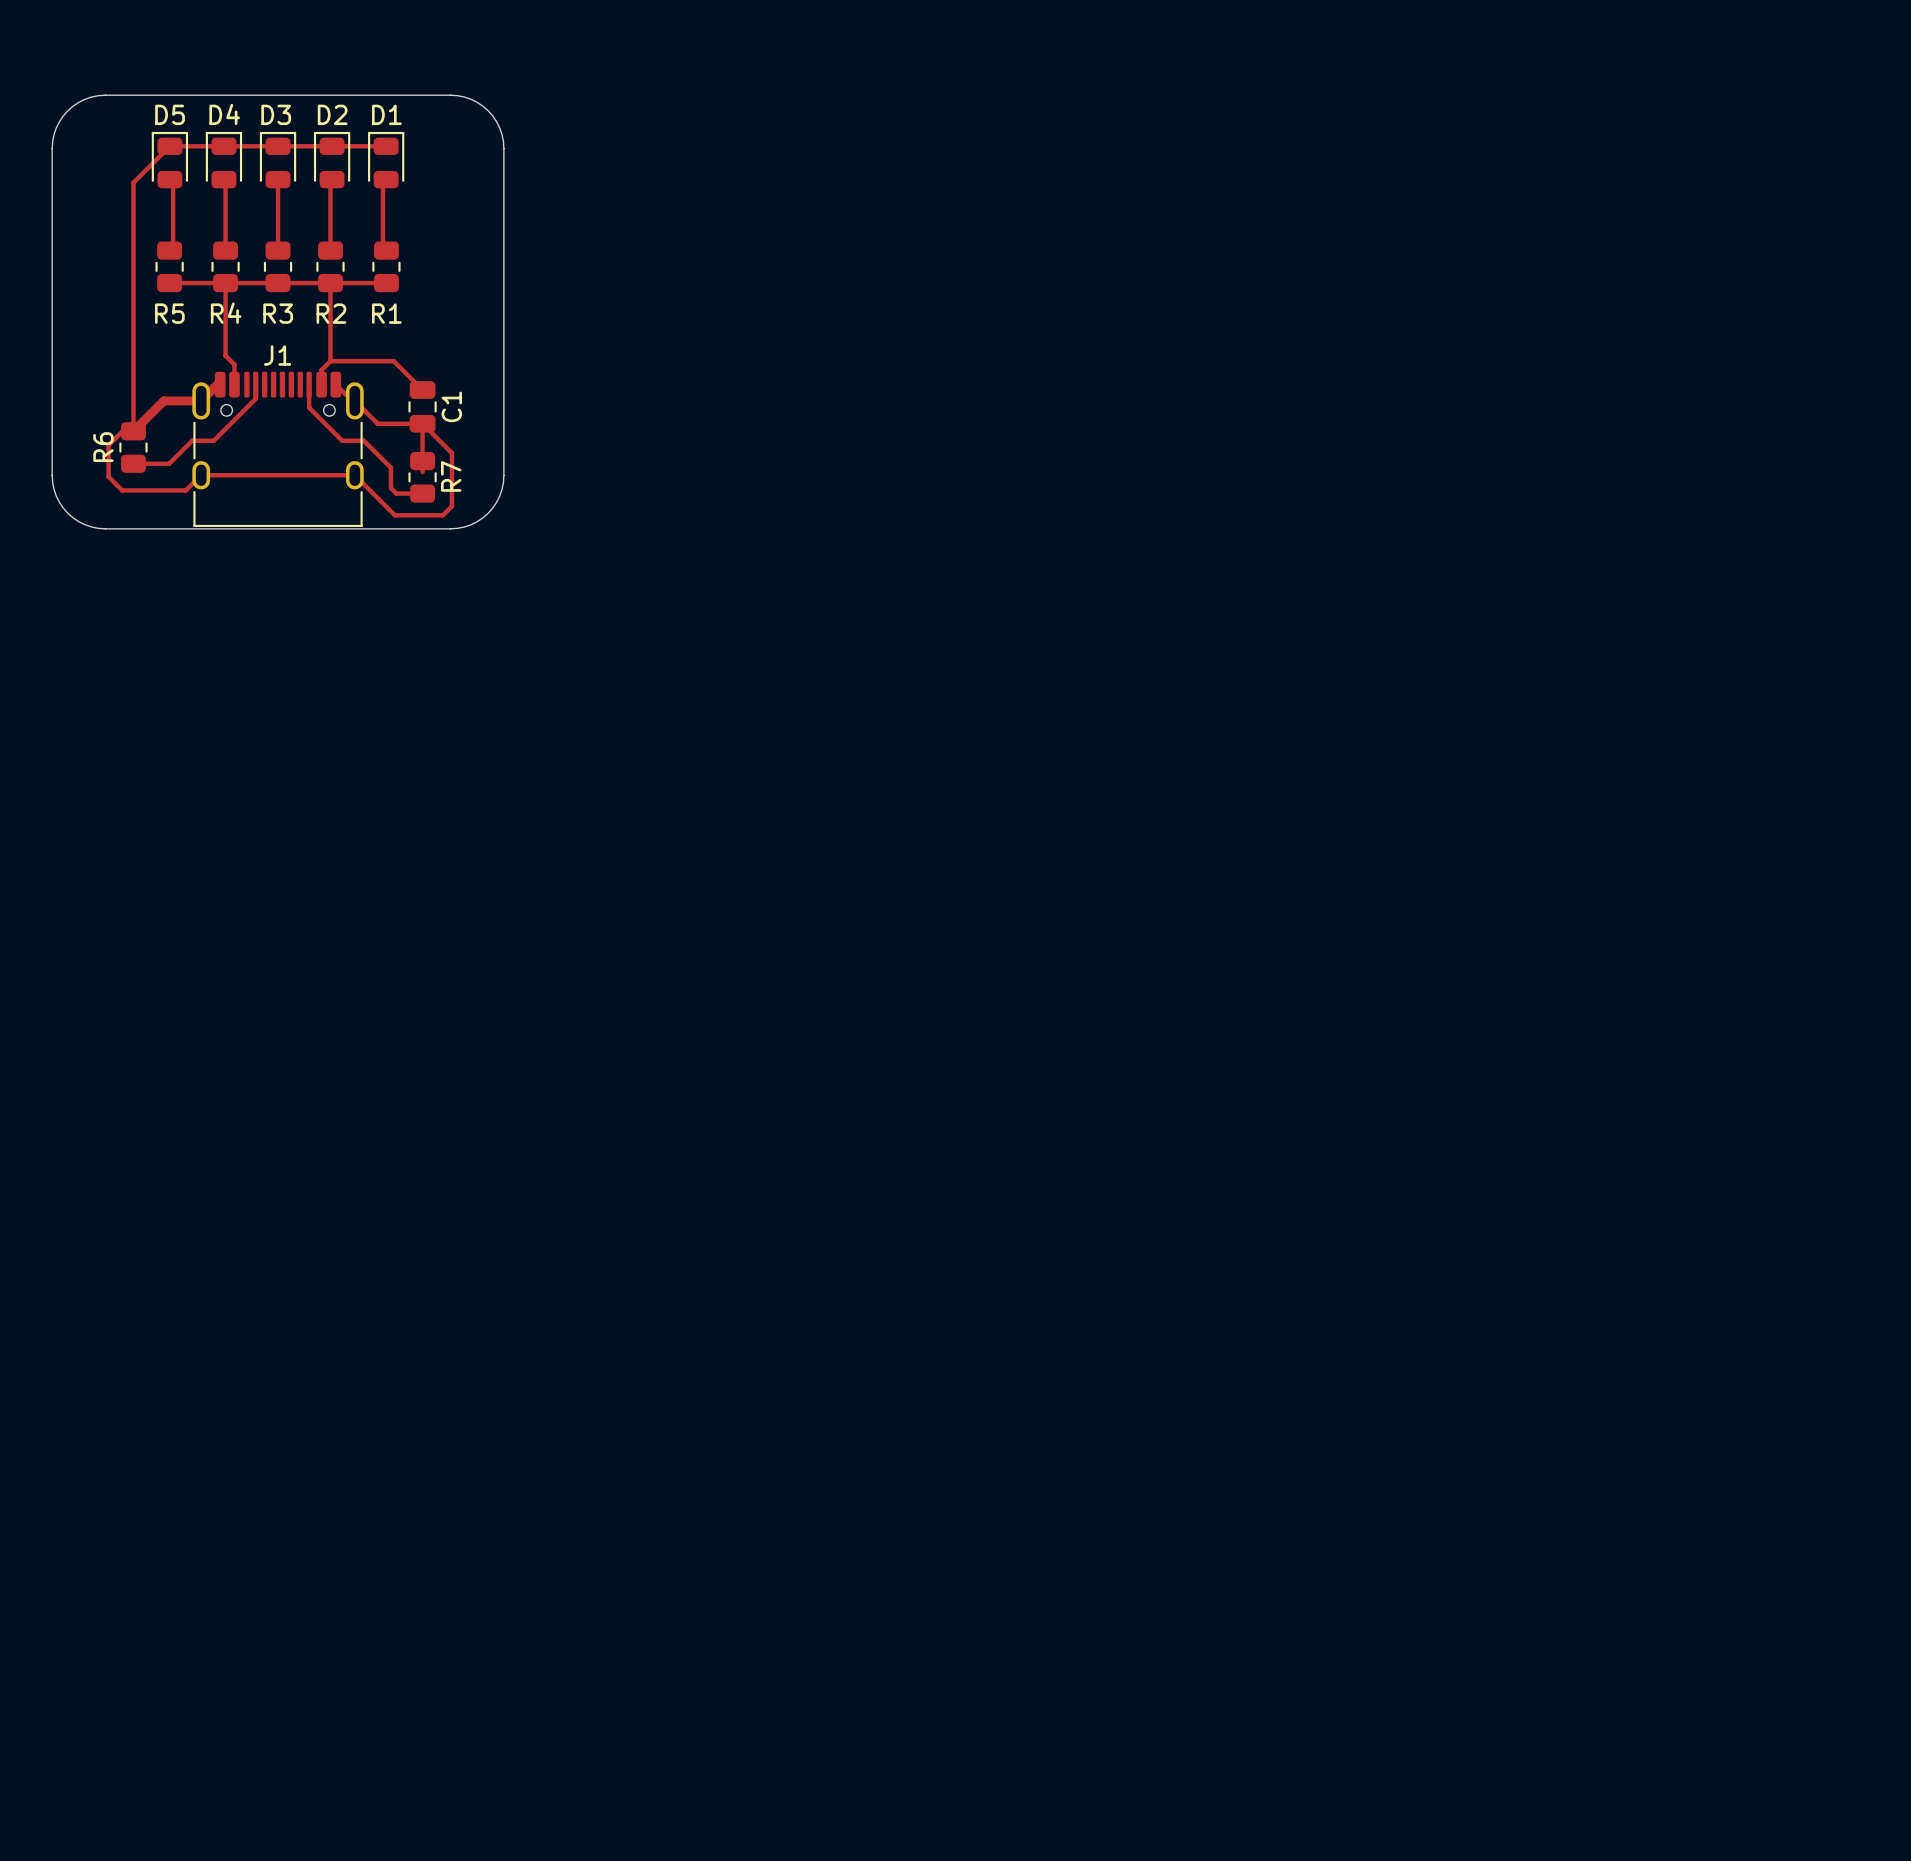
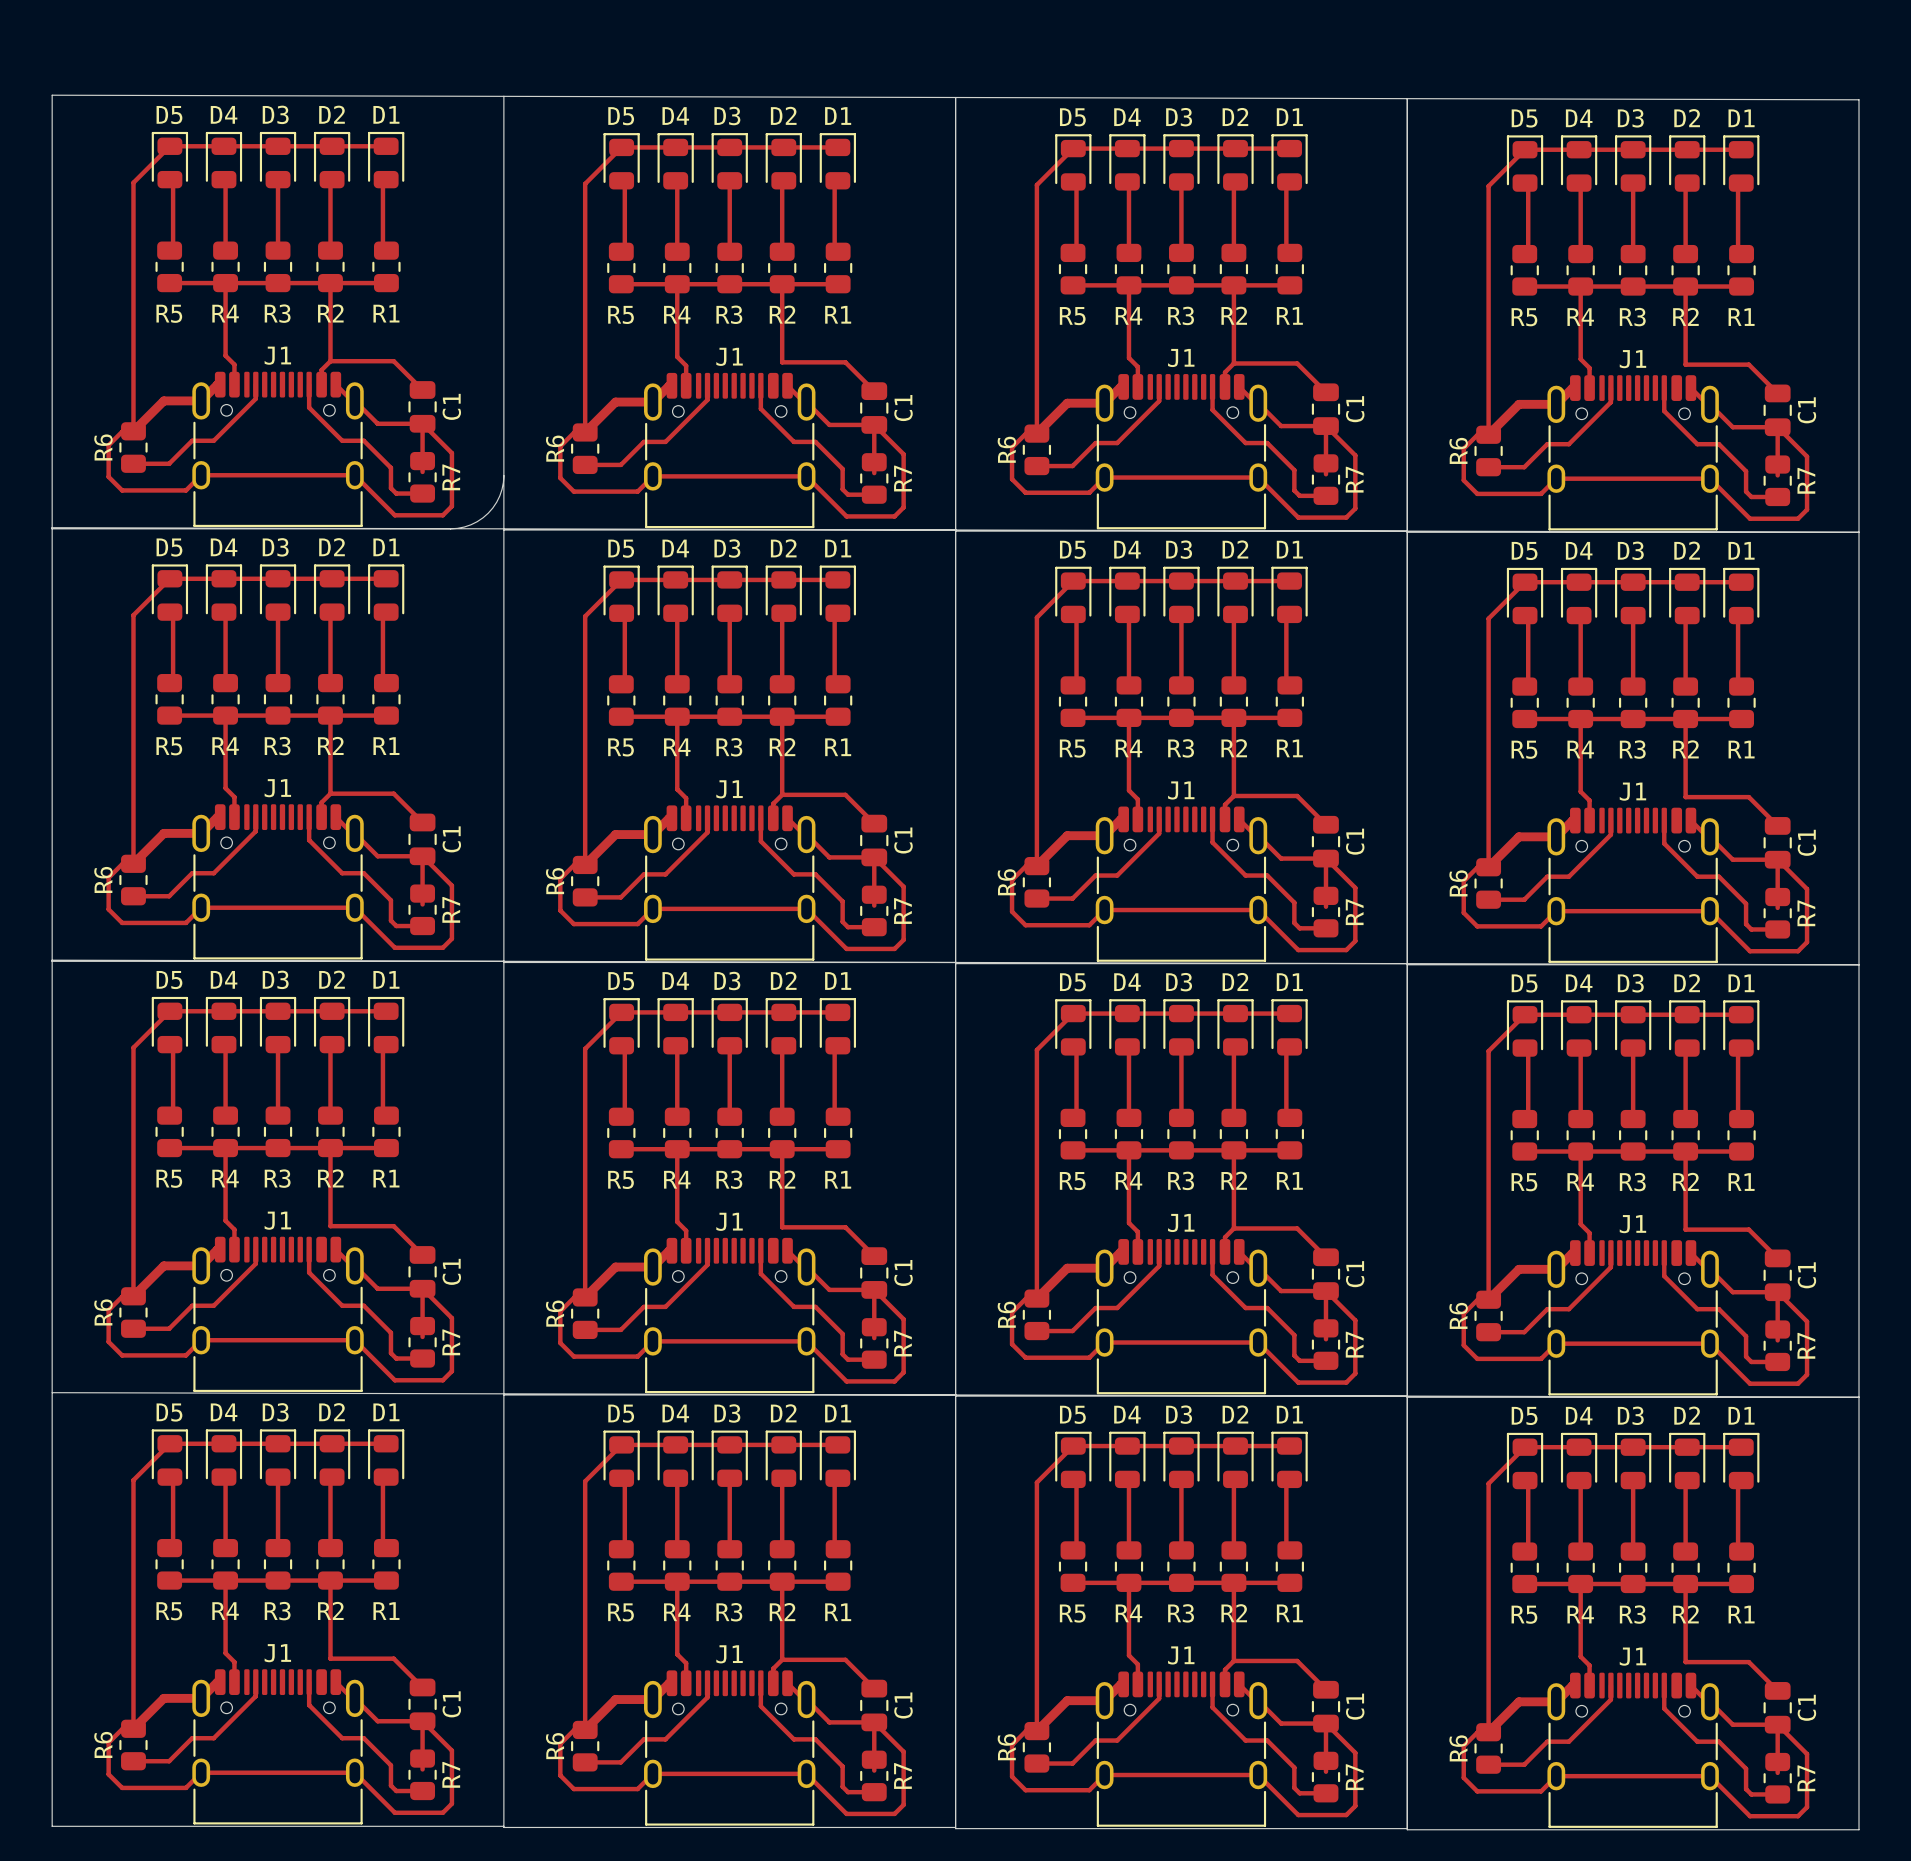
board edge: none -> (955, 97) (955, 1828) (1407, 1828)
board edge: none -> (1407, 98) (1407, 1829) (1859, 1829) (1859, 99) (52, 95) (52, 148)
track: none -> (837, 147) (621, 147) (585, 183) (585, 432)
board edge: (52, 148) (56, 128) (67, 110) (85, 99) (105, 95) (457, 95) (470, 99) (488, 110) (499, 128) (503, 148) -> (503, 96) (503, 148)
track: none -> (1289, 148) (1073, 148) (1036, 185) (1036, 433)
track: none -> (1741, 149) (1525, 149) (1488, 186) (1488, 434)
D5: none -> (621, 161)
D4: none -> (675, 161)
D3: none -> (729, 161)
D2: none -> (783, 161)
D1: none -> (837, 161)
D5: none -> (1073, 162)
D4: none -> (1127, 162)
D3: none -> (1181, 162)
D2: none -> (1235, 162)
D1: none -> (1289, 162)
D5: none -> (1525, 163)
D4: none -> (1579, 163)
D3: none -> (1633, 163)
D2: none -> (1687, 163)
D1: none -> (1741, 163)
track: none -> (621, 180) (624, 183) (624, 251)
track: none -> (675, 180) (677, 182) (677, 251)
track: none -> (729, 180) (729, 251)
track: none -> (783, 180) (782, 182) (782, 251)
track: none -> (837, 180) (834, 183) (834, 251)
track: none -> (1073, 181) (1076, 185) (1076, 252)
track: none -> (1127, 181) (1128, 183) (1128, 252)
track: none -> (1181, 181) (1181, 252)
track: none -> (1235, 181) (1233, 183) (1233, 252)
track: none -> (1289, 181) (1286, 185) (1286, 252)
track: none -> (1525, 183) (1528, 186) (1528, 254)
track: none -> (1579, 183) (1580, 184) (1580, 254)
track: none -> (1633, 183) (1633, 254)
track: none -> (1687, 183) (1685, 184) (1685, 254)
track: none -> (1741, 183) (1738, 186) (1738, 254)
R5: none -> (621, 268)
R4: none -> (677, 268)
R3: none -> (729, 268)
R2: none -> (782, 268)
R1: none -> (838, 268)
R5: none -> (1073, 269)
R4: none -> (1128, 269)
R3: none -> (1181, 269)
R2: none -> (1233, 269)
R1: none -> (1289, 269)
R5: none -> (1524, 270)
R4: none -> (1580, 270)
R3: none -> (1633, 270)
R2: none -> (1685, 270)
R1: none -> (1741, 270)
track: none -> (624, 284) (834, 284)
track: none -> (677, 284) (677, 356) (686, 365) (686, 385)
track: none -> (782, 284) (782, 362) (845, 362) (874, 391)
track: none -> (1076, 285) (1286, 285)
track: none -> (1128, 285) (1128, 358) (1137, 366) (1137, 386)
track: none -> (1233, 285) (1233, 363)
track: none -> (1528, 286) (1738, 286)
track: none -> (1580, 286) (1580, 359) (1589, 368) (1589, 388)
track: none -> (1685, 286) (1685, 364) (1748, 364) (1777, 393)
track: none -> (1233, 363) (1297, 363) (1325, 392)
track: none -> (1233, 363) (1225, 372) (1225, 386)
track: none -> (671, 385) (669, 385) (652, 402) (615, 402) (585, 432)
track: none -> (707, 385) (707, 399) (665, 441) (643, 441) (620, 464) (585, 464)
track: none -> (760, 385) (760, 408) (793, 441) (815, 441) (842, 469) (842, 489) (848, 494) (874, 494)
track: none -> (787, 385) (829, 424) (874, 424)
track: none -> (1123, 386) (1120, 386) (1104, 403) (1067, 403) (1036, 433)
track: none -> (1159, 386) (1159, 401) (1117, 443) (1095, 443) (1072, 466) (1036, 466)
track: none -> (1212, 386) (1212, 409) (1245, 443) (1267, 443) (1294, 470) (1294, 490) (1299, 495) (1325, 495)
track: none -> (1239, 386) (1281, 426) (1325, 426)
track: none -> (1575, 388) (1572, 388) (1556, 404) (1519, 404) (1488, 434)
track: none -> (1610, 388) (1610, 402) (1568, 444) (1547, 444) (1524, 467) (1488, 467)
track: none -> (1664, 388) (1664, 411) (1697, 444) (1718, 444) (1746, 471) (1746, 491) (1751, 496) (1777, 496)
track: none -> (1690, 388) (1732, 427) (1777, 427)
C1: none -> (874, 408)
C1: none -> (1325, 409)
C1: none -> (1777, 410)
track: none -> (874, 424) (874, 473)
track: none -> (874, 424) (903, 454) (903, 507) (894, 516) (846, 516) (806, 476) (652, 476) (637, 491) (573, 491) (560, 478) (560, 446) (574, 432) (585, 432)
track: none -> (1325, 426) (1325, 474)
track: none -> (1325, 426) (1355, 455) (1355, 508) (1346, 517) (1298, 517) (1258, 477) (1104, 477) (1089, 492) (1025, 492) (1012, 479) (1012, 447) (1026, 433) (1036, 433)
track: none -> (1777, 427) (1777, 475)
track: none -> (1777, 427) (1807, 456) (1807, 509) (1798, 518) (1750, 518) (1709, 478) (1556, 478) (1541, 493) (1477, 493) (1463, 480) (1463, 448) (1477, 434) (1488, 434)
R6: none -> (585, 448)
R6: none -> (1036, 449)
J1: none -> (729, 450)
R6: none -> (1488, 450)
J1: none -> (1181, 451)
J1: none -> (1633, 452)
board edge: (52, 475) (56, 495) (67, 513) (85, 524) (105, 528) -> (52, 528) (105, 528)
board edge: none -> (52, 475) (52, 1826) (503, 1826)
board edge: none -> (503, 475) (503, 1827) (955, 1827)
R7: none -> (874, 478)
R7: none -> (1325, 479)
R7: none -> (1777, 480)
board edge: none -> (52, 527) (1859, 532) (1407, 532)
board edge: none -> (503, 529) (955, 529)
board edge: none -> (955, 531) (1407, 531)
track: none -> (386, 578) (169, 578) (133, 615) (133, 863)
track: none -> (837, 579) (621, 579) (585, 616) (585, 864)
track: none -> (1289, 581) (1073, 581) (1036, 617) (1036, 866)
track: none -> (1741, 582) (1525, 582) (1488, 618) (1488, 867)
D5: none -> (169, 592)
D4: none -> (223, 592)
D3: none -> (278, 592)
D2: none -> (332, 592)
D1: none -> (386, 592)
D5: none -> (621, 593)
D4: none -> (675, 593)
D3: none -> (729, 593)
D2: none -> (783, 593)
D1: none -> (837, 593)
D5: none -> (1073, 594)
D4: none -> (1127, 594)
D3: none -> (1181, 594)
D2: none -> (1235, 594)
D1: none -> (1289, 594)
D5: none -> (1525, 596)
D4: none -> (1579, 596)
D3: none -> (1633, 596)
D2: none -> (1687, 596)
D1: none -> (1741, 596)
track: none -> (169, 612) (173, 615) (173, 683)
track: none -> (223, 612) (225, 613) (225, 683)
track: none -> (278, 612) (278, 683)
track: none -> (332, 612) (330, 613) (330, 683)
track: none -> (386, 612) (382, 615) (382, 683)
track: none -> (621, 613) (624, 616) (624, 684)
track: none -> (675, 613) (677, 614) (677, 684)
track: none -> (729, 613) (729, 684)
track: none -> (783, 613) (782, 614) (782, 684)
track: none -> (837, 613) (834, 616) (834, 684)
track: none -> (1073, 614) (1076, 617) (1076, 685)
track: none -> (1127, 614) (1128, 616) (1128, 685)
track: none -> (1181, 614) (1181, 685)
track: none -> (1235, 614) (1233, 616) (1233, 685)
track: none -> (1289, 614) (1286, 617) (1286, 685)
track: none -> (1525, 615) (1528, 618) (1528, 686)
track: none -> (1579, 615) (1580, 617) (1580, 686)
track: none -> (1633, 615) (1633, 686)
track: none -> (1687, 615) (1685, 617) (1685, 686)
track: none -> (1741, 615) (1738, 618) (1738, 686)
R5: none -> (169, 699)
R4: none -> (225, 699)
R3: none -> (278, 699)
R2: none -> (330, 699)
R1: none -> (386, 699)
R5: none -> (621, 700)
R4: none -> (677, 700)
R3: none -> (729, 700)
R2: none -> (782, 700)
R1: none -> (838, 700)
R5: none -> (1073, 701)
R4: none -> (1128, 701)
R3: none -> (1181, 701)
R2: none -> (1233, 701)
R1: none -> (1289, 701)
R5: none -> (1524, 702)
R4: none -> (1580, 702)
R3: none -> (1633, 702)
R2: none -> (1685, 702)
R1: none -> (1741, 702)
track: none -> (173, 715) (382, 715)
track: none -> (225, 715) (225, 788) (234, 797) (234, 817)
track: none -> (330, 715) (330, 793)
track: none -> (624, 716) (834, 716)
track: none -> (677, 716) (677, 789) (686, 798) (686, 818)
track: none -> (782, 716) (782, 794)
track: none -> (1076, 717) (1286, 717)
track: none -> (1128, 717) (1128, 790) (1137, 799) (1137, 819)
track: none -> (1233, 717) (1233, 795)
track: none -> (1528, 719) (1738, 719)
track: none -> (1580, 719) (1580, 791) (1589, 800) (1589, 820)
track: none -> (1685, 719) (1685, 797) (1748, 797) (1777, 825)
track: none -> (330, 793) (321, 802) (321, 817)
track: none -> (330, 793) (393, 793) (422, 822)
track: none -> (782, 794) (773, 803) (773, 818)
track: none -> (782, 794) (845, 794) (874, 823)
track: none -> (1233, 795) (1225, 804) (1225, 819)
track: none -> (1233, 795) (1297, 795) (1325, 824)
track: none -> (220, 817) (217, 817) (201, 833) (163, 833) (133, 863)
track: none -> (255, 817) (255, 831) (213, 873) (192, 873) (169, 896) (133, 896)
track: none -> (309, 817) (309, 840) (342, 873) (363, 873) (390, 900) (390, 920) (396, 926) (422, 926)
track: none -> (335, 817) (377, 856) (422, 856)
track: none -> (671, 818) (669, 818) (652, 834) (615, 834) (585, 864)
track: none -> (707, 818) (707, 832) (665, 874) (643, 874) (620, 897) (585, 897)
track: none -> (760, 818) (760, 841) (793, 874) (815, 874) (842, 901) (842, 921) (848, 927) (874, 927)
track: none -> (787, 818) (829, 857) (874, 857)
track: none -> (1123, 819) (1120, 819) (1104, 835) (1067, 835) (1036, 866)
track: none -> (1159, 819) (1159, 833) (1117, 875) (1095, 875) (1072, 898) (1036, 898)
track: none -> (1212, 819) (1212, 842) (1245, 875) (1267, 875) (1294, 902) (1294, 922) (1299, 928) (1325, 928)
track: none -> (1239, 819) (1281, 858) (1325, 858)
track: none -> (1575, 820) (1572, 820) (1556, 836) (1519, 836) (1488, 867)
track: none -> (1610, 820) (1610, 834) (1568, 876) (1547, 876) (1524, 899) (1488, 899)
track: none -> (1664, 820) (1664, 843) (1697, 876) (1718, 876) (1746, 903) (1746, 924) (1751, 929) (1777, 929)
track: none -> (1690, 820) (1732, 859) (1777, 859)
C1: none -> (422, 839)
C1: none -> (874, 840)
C1: none -> (1325, 841)
C1: none -> (1777, 842)
track: none -> (422, 856) (422, 904)
track: none -> (422, 856) (451, 885) (451, 938) (442, 947) (394, 947) (354, 907) (201, 907) (185, 922) (122, 922) (108, 909) (108, 877) (122, 863) (133, 863)
track: none -> (874, 857) (874, 905)
track: none -> (874, 857) (903, 886) (903, 939) (894, 948) (846, 948) (806, 908) (652, 908) (637, 924) (573, 924) (560, 910) (560, 878) (574, 864) (585, 864)
track: none -> (1325, 858) (1325, 906)
track: none -> (1325, 858) (1355, 887) (1355, 941) (1346, 950) (1298, 950) (1258, 910) (1104, 910) (1089, 925) (1025, 925) (1012, 911) (1012, 880) (1026, 866) (1036, 866)
track: none -> (1777, 859) (1777, 907)
track: none -> (1777, 859) (1807, 889) (1807, 942) (1798, 951) (1750, 951) (1709, 911) (1556, 911) (1541, 926) (1477, 926) (1463, 912) (1463, 881) (1477, 867) (1488, 867)
R6: none -> (133, 880)
J1: none -> (278, 881)
R6: none -> (585, 881)
R6: none -> (1036, 882)
J1: none -> (729, 883)
R6: none -> (1488, 883)
J1: none -> (1181, 884)
J1: none -> (1633, 885)
R7: none -> (422, 909)
R7: none -> (874, 910)
R7: none -> (1325, 912)
R7: none -> (1777, 913)
board edge: none -> (52, 960) (1859, 964) (1407, 964)
board edge: none -> (52, 961) (503, 961)
board edge: none -> (503, 962) (955, 962)
board edge: none -> (955, 963) (1407, 963)
track: none -> (386, 1011) (169, 1011) (133, 1047) (133, 1296)
track: none -> (837, 1012) (621, 1012) (585, 1048) (585, 1297)
track: none -> (1289, 1013) (1073, 1013) (1036, 1049) (1036, 1298)
track: none -> (1741, 1014) (1525, 1014) (1488, 1051) (1488, 1299)
D5: none -> (169, 1025)
D4: none -> (223, 1025)
D3: none -> (278, 1025)
D2: none -> (332, 1025)
D1: none -> (386, 1025)
D5: none -> (621, 1026)
D4: none -> (675, 1026)
D3: none -> (729, 1026)
D2: none -> (783, 1026)
D1: none -> (837, 1026)
D5: none -> (1073, 1027)
D4: none -> (1127, 1027)
D3: none -> (1181, 1027)
D2: none -> (1235, 1027)
D1: none -> (1289, 1027)
D5: none -> (1525, 1028)
D4: none -> (1579, 1028)
D3: none -> (1633, 1028)
D2: none -> (1687, 1028)
D1: none -> (1741, 1028)
track: none -> (169, 1044) (173, 1047) (173, 1115)
track: none -> (223, 1044) (225, 1046) (225, 1115)
track: none -> (278, 1044) (278, 1115)
track: none -> (332, 1044) (330, 1046) (330, 1115)
track: none -> (386, 1044) (382, 1047) (382, 1115)
track: none -> (621, 1045) (624, 1048) (624, 1116)
track: none -> (675, 1045) (677, 1047) (677, 1116)
track: none -> (729, 1045) (729, 1116)
track: none -> (783, 1045) (782, 1047) (782, 1116)
track: none -> (837, 1045) (834, 1048) (834, 1116)
track: none -> (1073, 1046) (1076, 1050) (1076, 1117)
track: none -> (1127, 1046) (1128, 1048) (1128, 1117)
track: none -> (1181, 1046) (1181, 1117)
track: none -> (1235, 1046) (1233, 1048) (1233, 1117)
track: none -> (1289, 1046) (1286, 1050) (1286, 1117)
track: none -> (1525, 1048) (1528, 1051) (1528, 1119)
track: none -> (1579, 1048) (1580, 1049) (1580, 1119)
track: none -> (1633, 1048) (1633, 1119)
track: none -> (1687, 1048) (1685, 1049) (1685, 1119)
track: none -> (1741, 1048) (1738, 1051) (1738, 1119)
R5: none -> (169, 1131)
R4: none -> (225, 1131)
R3: none -> (278, 1131)
R2: none -> (330, 1131)
R1: none -> (386, 1131)
R5: none -> (621, 1132)
R4: none -> (677, 1132)
R3: none -> (729, 1132)
R2: none -> (782, 1132)
R1: none -> (838, 1132)
R5: none -> (1073, 1134)
R4: none -> (1128, 1134)
R3: none -> (1181, 1134)
R2: none -> (1233, 1134)
R1: none -> (1289, 1134)
R5: none -> (1524, 1135)
R4: none -> (1580, 1135)
R3: none -> (1633, 1135)
R2: none -> (1685, 1135)
R1: none -> (1741, 1135)
track: none -> (173, 1148) (382, 1148)
track: none -> (225, 1148) (225, 1220) (234, 1229) (234, 1249)
track: none -> (330, 1148) (330, 1226) (393, 1226) (422, 1254)
track: none -> (624, 1149) (834, 1149)
track: none -> (677, 1149) (677, 1221) (686, 1230) (686, 1250)
track: none -> (782, 1149) (782, 1227) (845, 1227) (874, 1256)
track: none -> (1076, 1150) (1286, 1150)
track: none -> (1128, 1150) (1128, 1223) (1137, 1231) (1137, 1251)
track: none -> (1233, 1150) (1233, 1228)
track: none -> (1528, 1151) (1738, 1151)
track: none -> (1580, 1151) (1580, 1224) (1589, 1233) (1589, 1253)
track: none -> (1685, 1151) (1685, 1229) (1748, 1229) (1777, 1258)
track: none -> (1233, 1228) (1297, 1228) (1325, 1257)
track: none -> (1233, 1228) (1225, 1237) (1225, 1251)
track: none -> (220, 1249) (217, 1249) (201, 1265) (163, 1265) (133, 1296)
track: none -> (255, 1249) (255, 1263) (213, 1305) (192, 1305) (169, 1328) (133, 1328)
track: none -> (309, 1249) (309, 1272) (342, 1305) (363, 1305) (390, 1332) (390, 1353) (396, 1358) (422, 1358)
track: none -> (335, 1249) (377, 1288) (422, 1288)
track: none -> (671, 1250) (669, 1250) (652, 1267) (615, 1267) (585, 1297)
track: none -> (707, 1250) (707, 1264) (665, 1306) (643, 1306) (620, 1329) (585, 1329)
track: none -> (760, 1250) (760, 1273) (793, 1306) (815, 1306) (842, 1333) (842, 1354) (848, 1359) (874, 1359)
track: none -> (787, 1250) (829, 1289) (874, 1289)
track: none -> (1123, 1251) (1120, 1251) (1104, 1268) (1067, 1268) (1036, 1298)
track: none -> (1159, 1251) (1159, 1266) (1117, 1308) (1095, 1308) (1072, 1331) (1036, 1331)
track: none -> (1212, 1251) (1212, 1274) (1245, 1308) (1267, 1308) (1294, 1335) (1294, 1355) (1299, 1360) (1325, 1360)
track: none -> (1239, 1251) (1281, 1291) (1325, 1291)
track: none -> (1575, 1253) (1572, 1253) (1556, 1269) (1519, 1269) (1488, 1299)
track: none -> (1610, 1253) (1610, 1267) (1568, 1309) (1547, 1309) (1524, 1332) (1488, 1332)
track: none -> (1664, 1253) (1664, 1276) (1697, 1309) (1718, 1309) (1746, 1336) (1746, 1356) (1751, 1361) (1777, 1361)
track: none -> (1690, 1253) (1732, 1292) (1777, 1292)
C1: none -> (422, 1271)
C1: none -> (874, 1273)
C1: none -> (1325, 1274)
C1: none -> (1777, 1275)
track: none -> (422, 1288) (422, 1336)
track: none -> (422, 1288) (451, 1318) (451, 1371) (442, 1380) (394, 1380) (354, 1340) (201, 1340) (185, 1355) (122, 1355) (108, 1341) (108, 1310) (122, 1296) (133, 1296)
track: none -> (874, 1289) (874, 1338)
track: none -> (874, 1289) (903, 1319) (903, 1372) (894, 1381) (846, 1381) (806, 1341) (652, 1341) (637, 1356) (573, 1356) (560, 1343) (560, 1311) (574, 1297) (585, 1297)
track: none -> (1325, 1291) (1355, 1320) (1355, 1373) (1346, 1382) (1298, 1382) (1258, 1342) (1104, 1342) (1089, 1357) (1025, 1357) (1012, 1344) (1012, 1312) (1026, 1298) (1036, 1298)
track: none -> (1325, 1291) (1325, 1339)
track: none -> (1777, 1292) (1777, 1340)
track: none -> (1777, 1292) (1807, 1321) (1807, 1374) (1798, 1383) (1750, 1383) (1709, 1343) (1556, 1343) (1541, 1358) (1477, 1358) (1463, 1345) (1463, 1313) (1477, 1299) (1488, 1299)
R6: none -> (133, 1312)
R6: none -> (585, 1313)
J1: none -> (278, 1314)
R6: none -> (1036, 1314)
J1: none -> (729, 1315)
R6: none -> (1488, 1315)
J1: none -> (1181, 1316)
J1: none -> (1633, 1317)
R7: none -> (422, 1342)
R7: none -> (874, 1343)
R7: none -> (1325, 1344)
R7: none -> (1777, 1345)
board edge: none -> (52, 1392) (1859, 1397) (1407, 1397)
board edge: none -> (503, 1394) (955, 1394)
board edge: none -> (955, 1396) (1407, 1396)
track: none -> (386, 1443) (169, 1443) (133, 1480) (133, 1728)
track: none -> (837, 1444) (621, 1444) (585, 1481) (585, 1729)
track: none -> (1289, 1446) (1073, 1446) (1036, 1482) (1036, 1731)
track: none -> (1741, 1447) (1525, 1447) (1488, 1483) (1488, 1732)
D5: none -> (169, 1457)
D4: none -> (223, 1457)
D3: none -> (278, 1457)
D2: none -> (332, 1457)
D1: none -> (386, 1457)
D5: none -> (621, 1458)
D4: none -> (675, 1458)
D3: none -> (729, 1458)
D2: none -> (783, 1458)
D1: none -> (837, 1458)
D5: none -> (1073, 1459)
D4: none -> (1127, 1459)
D3: none -> (1181, 1459)
D2: none -> (1235, 1459)
D1: none -> (1289, 1459)
D5: none -> (1525, 1461)
D4: none -> (1579, 1461)
D3: none -> (1633, 1461)
D2: none -> (1687, 1461)
D1: none -> (1741, 1461)
track: none -> (169, 1477) (173, 1480) (173, 1548)
track: none -> (223, 1477) (225, 1478) (225, 1548)
track: none -> (278, 1477) (278, 1548)
track: none -> (332, 1477) (330, 1478) (330, 1548)
track: none -> (386, 1477) (382, 1480) (382, 1548)
track: none -> (621, 1478) (624, 1481) (624, 1549)
track: none -> (675, 1478) (677, 1479) (677, 1549)
track: none -> (729, 1478) (729, 1549)
track: none -> (783, 1478) (782, 1479) (782, 1549)
track: none -> (837, 1478) (834, 1481) (834, 1549)
track: none -> (1073, 1479) (1076, 1482) (1076, 1550)
track: none -> (1127, 1479) (1128, 1481) (1128, 1550)
track: none -> (1181, 1479) (1181, 1550)
track: none -> (1235, 1479) (1233, 1481) (1233, 1550)
track: none -> (1289, 1479) (1286, 1482) (1286, 1550)
track: none -> (1525, 1480) (1528, 1483) (1528, 1551)
track: none -> (1579, 1480) (1580, 1482) (1580, 1551)
track: none -> (1633, 1480) (1633, 1551)
track: none -> (1687, 1480) (1685, 1482) (1685, 1551)
track: none -> (1741, 1480) (1738, 1483) (1738, 1551)
R5: none -> (169, 1564)
R4: none -> (225, 1564)
R3: none -> (278, 1564)
R2: none -> (330, 1564)
R1: none -> (386, 1564)
R5: none -> (621, 1565)
R4: none -> (677, 1565)
R3: none -> (729, 1565)
R2: none -> (782, 1565)
R1: none -> (838, 1565)
R5: none -> (1073, 1566)
R4: none -> (1128, 1566)
R3: none -> (1181, 1566)
R2: none -> (1233, 1566)
R1: none -> (1289, 1566)
R5: none -> (1524, 1567)
R4: none -> (1580, 1567)
R3: none -> (1633, 1567)
R2: none -> (1685, 1567)
R1: none -> (1741, 1567)
track: none -> (173, 1580) (382, 1580)
track: none -> (225, 1580) (225, 1653) (234, 1662) (234, 1682)
track: none -> (330, 1580) (330, 1658) (393, 1658) (422, 1687)
track: none -> (624, 1581) (834, 1581)
track: none -> (677, 1581) (677, 1654) (686, 1663) (686, 1683)
track: none -> (782, 1581) (782, 1659)
track: none -> (1076, 1582) (1286, 1582)
track: none -> (1128, 1582) (1128, 1655) (1137, 1664) (1137, 1684)
track: none -> (1233, 1582) (1233, 1660)
track: none -> (1528, 1584) (1738, 1584)
track: none -> (1580, 1584) (1580, 1656) (1589, 1665) (1589, 1685)
track: none -> (1685, 1584) (1685, 1662) (1748, 1662) (1777, 1690)
track: none -> (782, 1659) (773, 1668) (773, 1683)
track: none -> (782, 1659) (845, 1659) (874, 1688)
track: none -> (1233, 1660) (1297, 1660) (1325, 1689)
track: none -> (1233, 1660) (1225, 1669) (1225, 1684)
track: none -> (220, 1682) (217, 1682) (201, 1698) (163, 1698) (133, 1728)
track: none -> (255, 1682) (255, 1696) (213, 1738) (192, 1738) (169, 1761) (133, 1761)
track: none -> (309, 1682) (309, 1705) (342, 1738) (363, 1738) (390, 1765) (390, 1785) (396, 1791) (422, 1791)
track: none -> (335, 1682) (377, 1721) (422, 1721)
track: none -> (671, 1683) (669, 1683) (652, 1699) (615, 1699) (585, 1729)
track: none -> (707, 1683) (707, 1697) (665, 1739) (643, 1739) (620, 1762) (585, 1762)
track: none -> (760, 1683) (760, 1706) (793, 1739) (815, 1739) (842, 1766) (842, 1786) (848, 1792) (874, 1792)
track: none -> (787, 1683) (829, 1722) (874, 1722)
track: none -> (1123, 1684) (1120, 1684) (1104, 1700) (1067, 1700) (1036, 1731)
track: none -> (1159, 1684) (1159, 1698) (1117, 1740) (1095, 1740) (1072, 1763) (1036, 1763)
track: none -> (1212, 1684) (1212, 1707) (1245, 1740) (1267, 1740) (1294, 1767) (1294, 1787) (1299, 1793) (1325, 1793)
track: none -> (1239, 1684) (1281, 1723) (1325, 1723)
track: none -> (1575, 1685) (1572, 1685) (1556, 1701) (1519, 1701) (1488, 1732)
track: none -> (1610, 1685) (1610, 1699) (1568, 1741) (1547, 1741) (1524, 1764) (1488, 1764)
track: none -> (1664, 1685) (1664, 1708) (1697, 1741) (1718, 1741) (1746, 1768) (1746, 1789) (1751, 1794) (1777, 1794)
track: none -> (1690, 1685) (1732, 1724) (1777, 1724)
C1: none -> (422, 1704)
C1: none -> (874, 1705)
C1: none -> (1325, 1706)
C1: none -> (1777, 1707)
track: none -> (422, 1721) (422, 1769)
track: none -> (422, 1721) (451, 1750) (451, 1803) (442, 1812) (394, 1812) (354, 1772) (201, 1772) (185, 1787) (122, 1787) (108, 1774) (108, 1742) (122, 1728) (133, 1728)
track: none -> (874, 1722) (903, 1751) (903, 1804) (894, 1813) (846, 1813) (806, 1773) (652, 1773) (637, 1789) (573, 1789) (560, 1775) (560, 1743) (574, 1729) (585, 1729)
track: none -> (874, 1722) (874, 1770)
track: none -> (1325, 1723) (1325, 1771)
track: none -> (1325, 1723) (1355, 1752) (1355, 1806) (1346, 1815) (1298, 1815) (1258, 1775) (1104, 1775) (1089, 1790) (1025, 1790) (1012, 1776) (1012, 1745) (1026, 1731) (1036, 1731)
track: none -> (1777, 1724) (1777, 1772)
track: none -> (1777, 1724) (1807, 1754) (1807, 1807) (1798, 1816) (1750, 1816) (1709, 1776) (1556, 1776) (1541, 1791) (1477, 1791) (1463, 1777) (1463, 1746) (1477, 1732) (1488, 1732)
R6: none -> (133, 1745)
J1: none -> (278, 1746)
R6: none -> (585, 1746)
J1: none -> (729, 1747)
R6: none -> (1036, 1747)
R6: none -> (1488, 1748)
J1: none -> (1181, 1749)
J1: none -> (1633, 1750)
R7: none -> (422, 1774)
R7: none -> (874, 1775)
R7: none -> (1325, 1777)
R7: none -> (1777, 1778)

